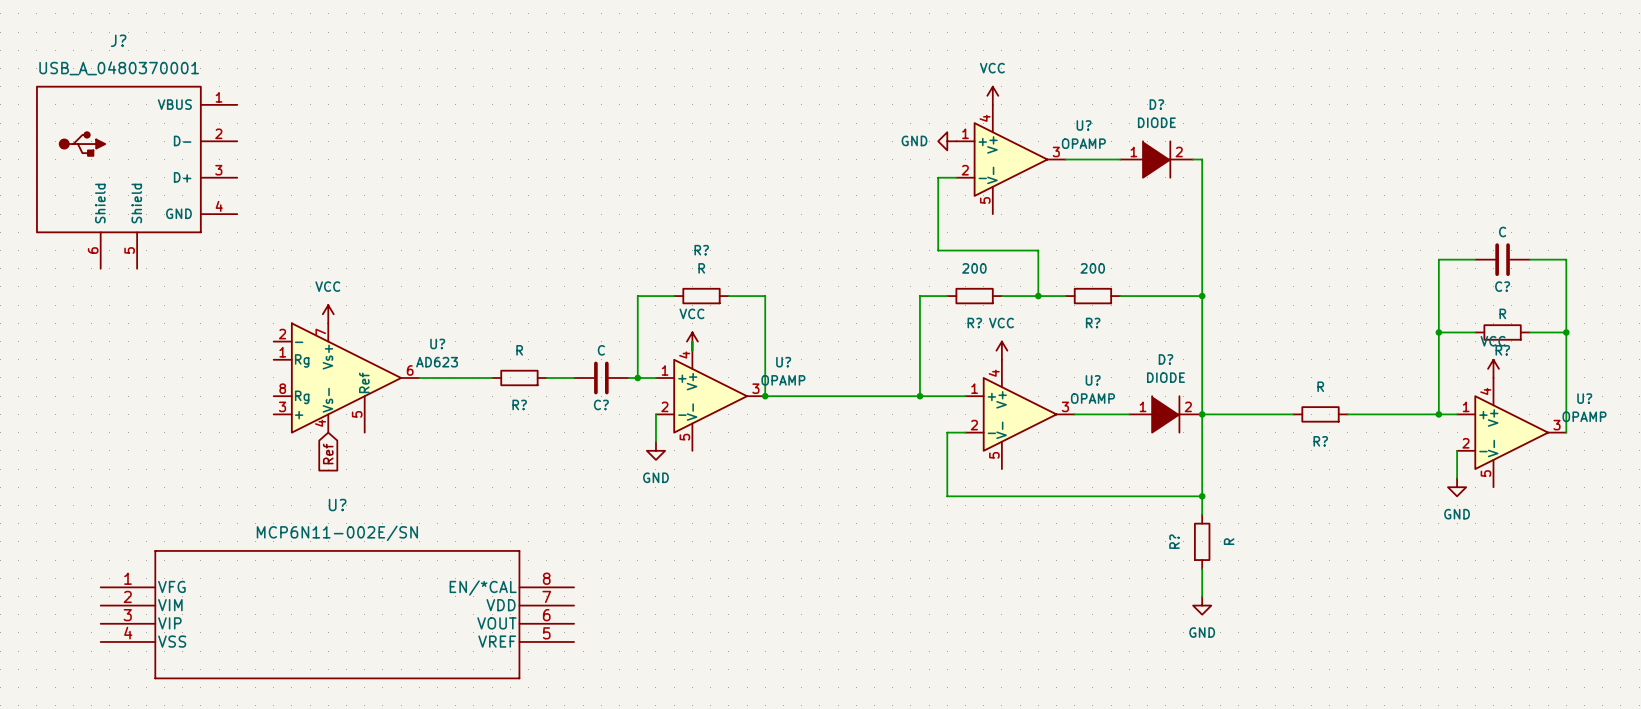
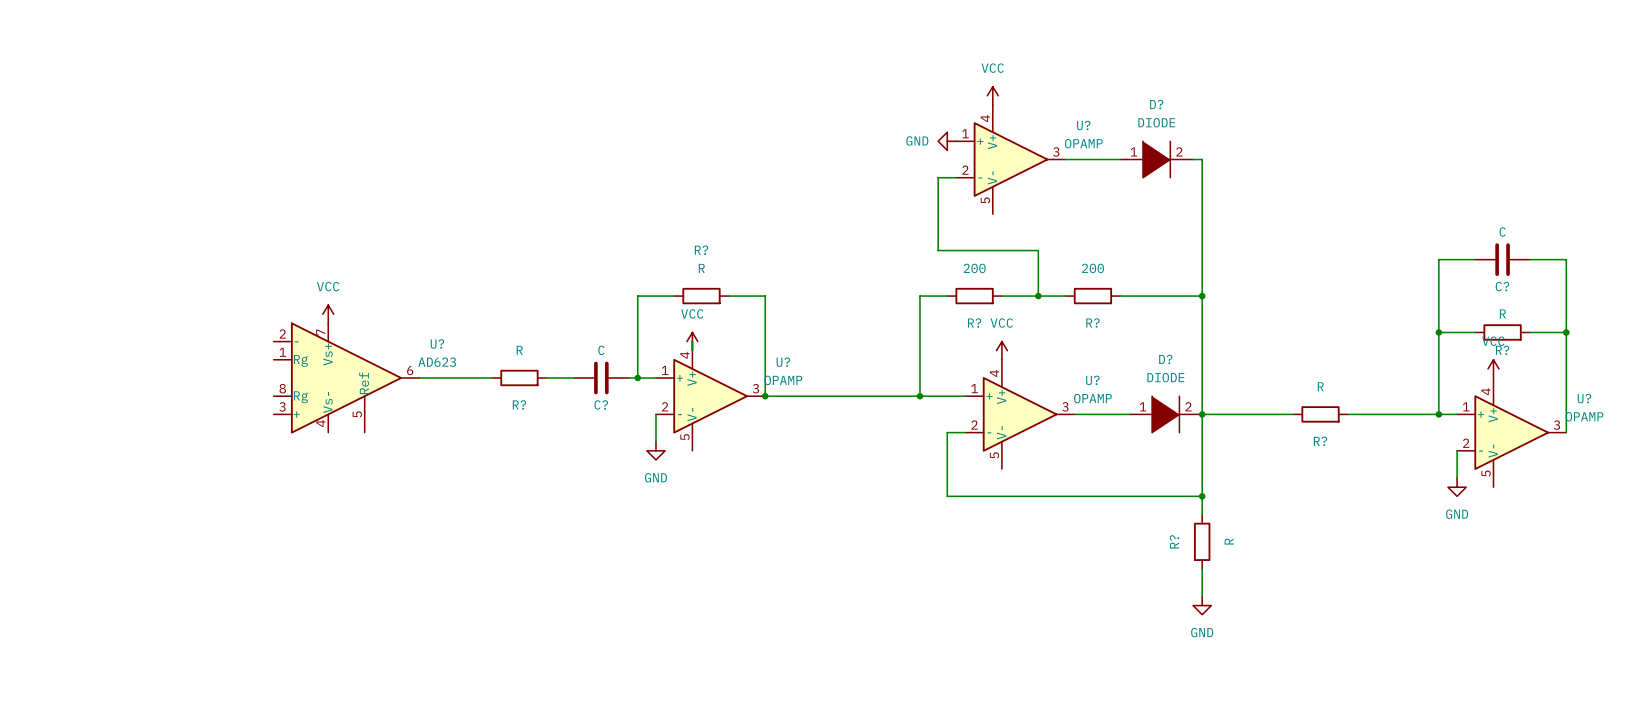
J?: USB_A_0480370001 (136, 177) -> none
global label: Ref (328, 453) -> none
U?: MCP6N11-002E/SN (337, 614) -> none

